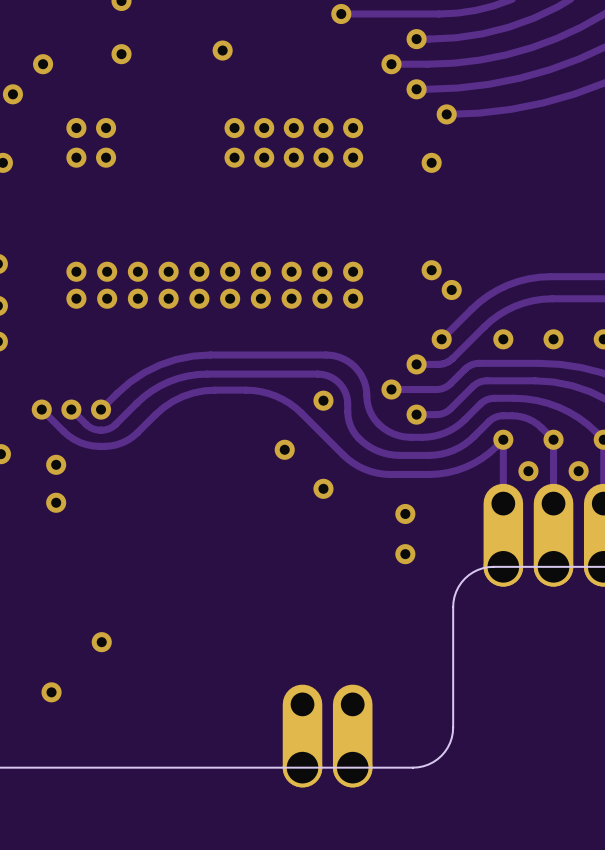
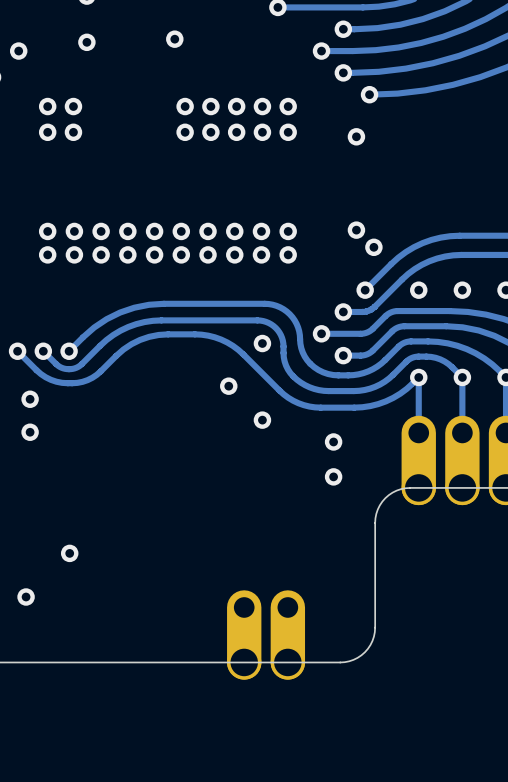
via: (528, 471) -> none
via: (578, 471) -> none

